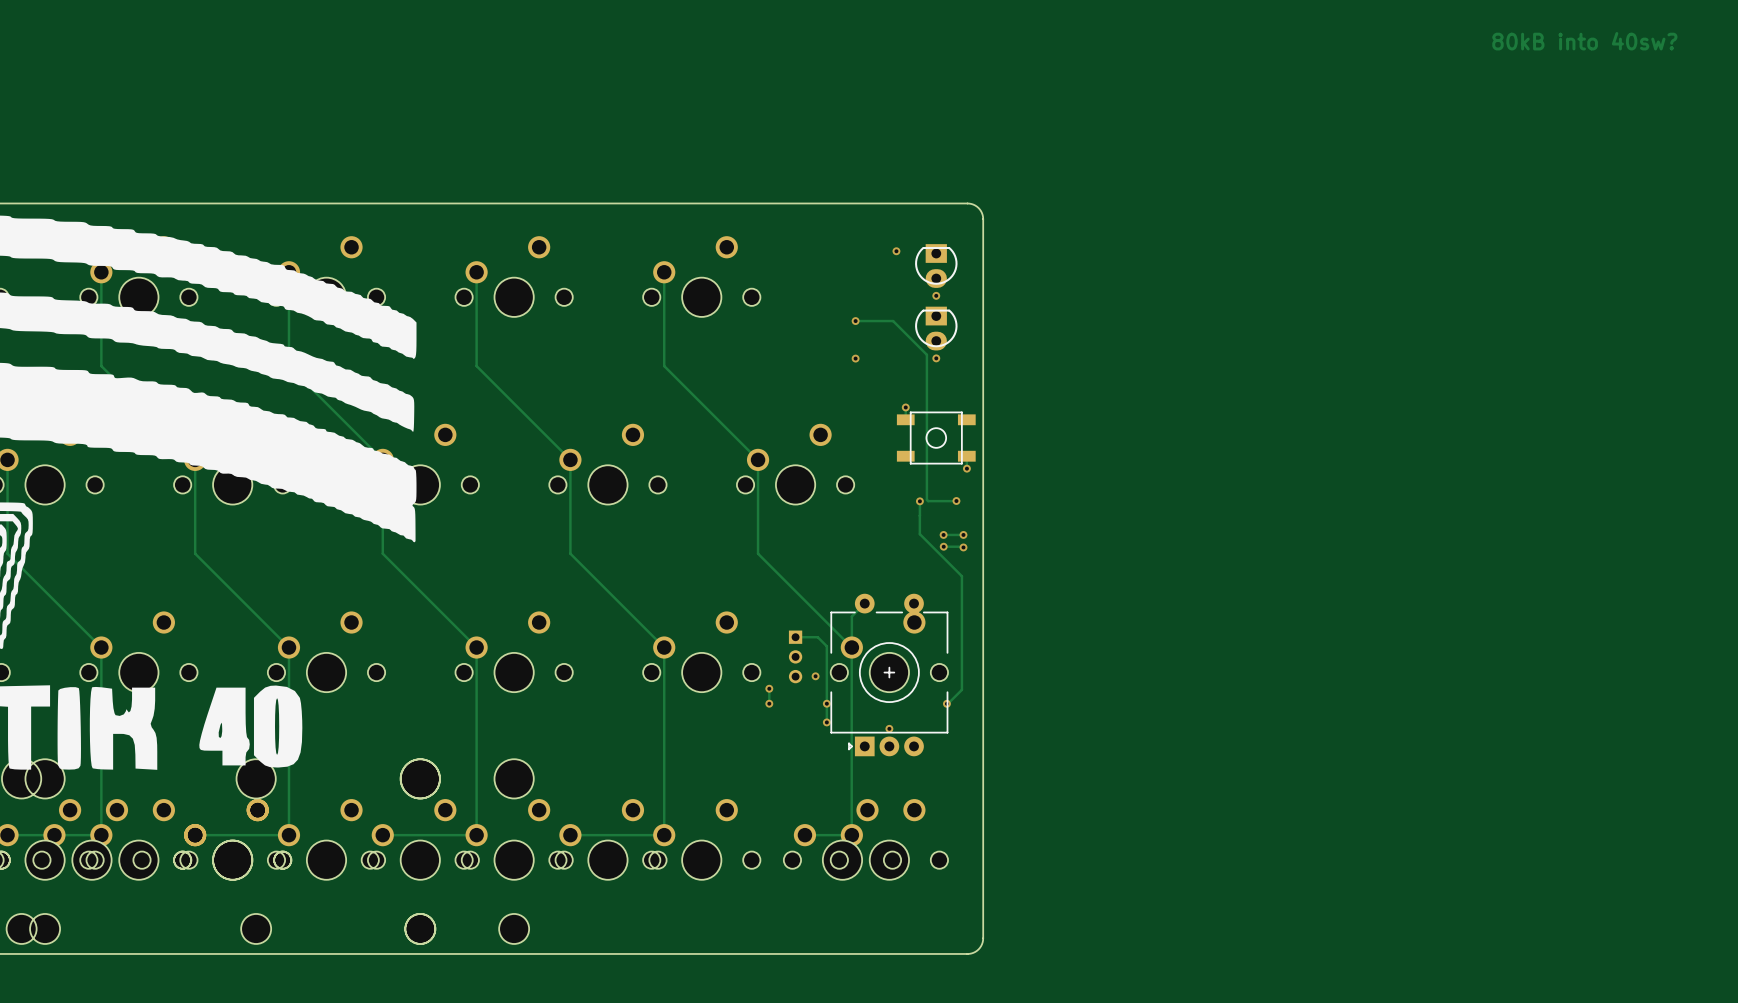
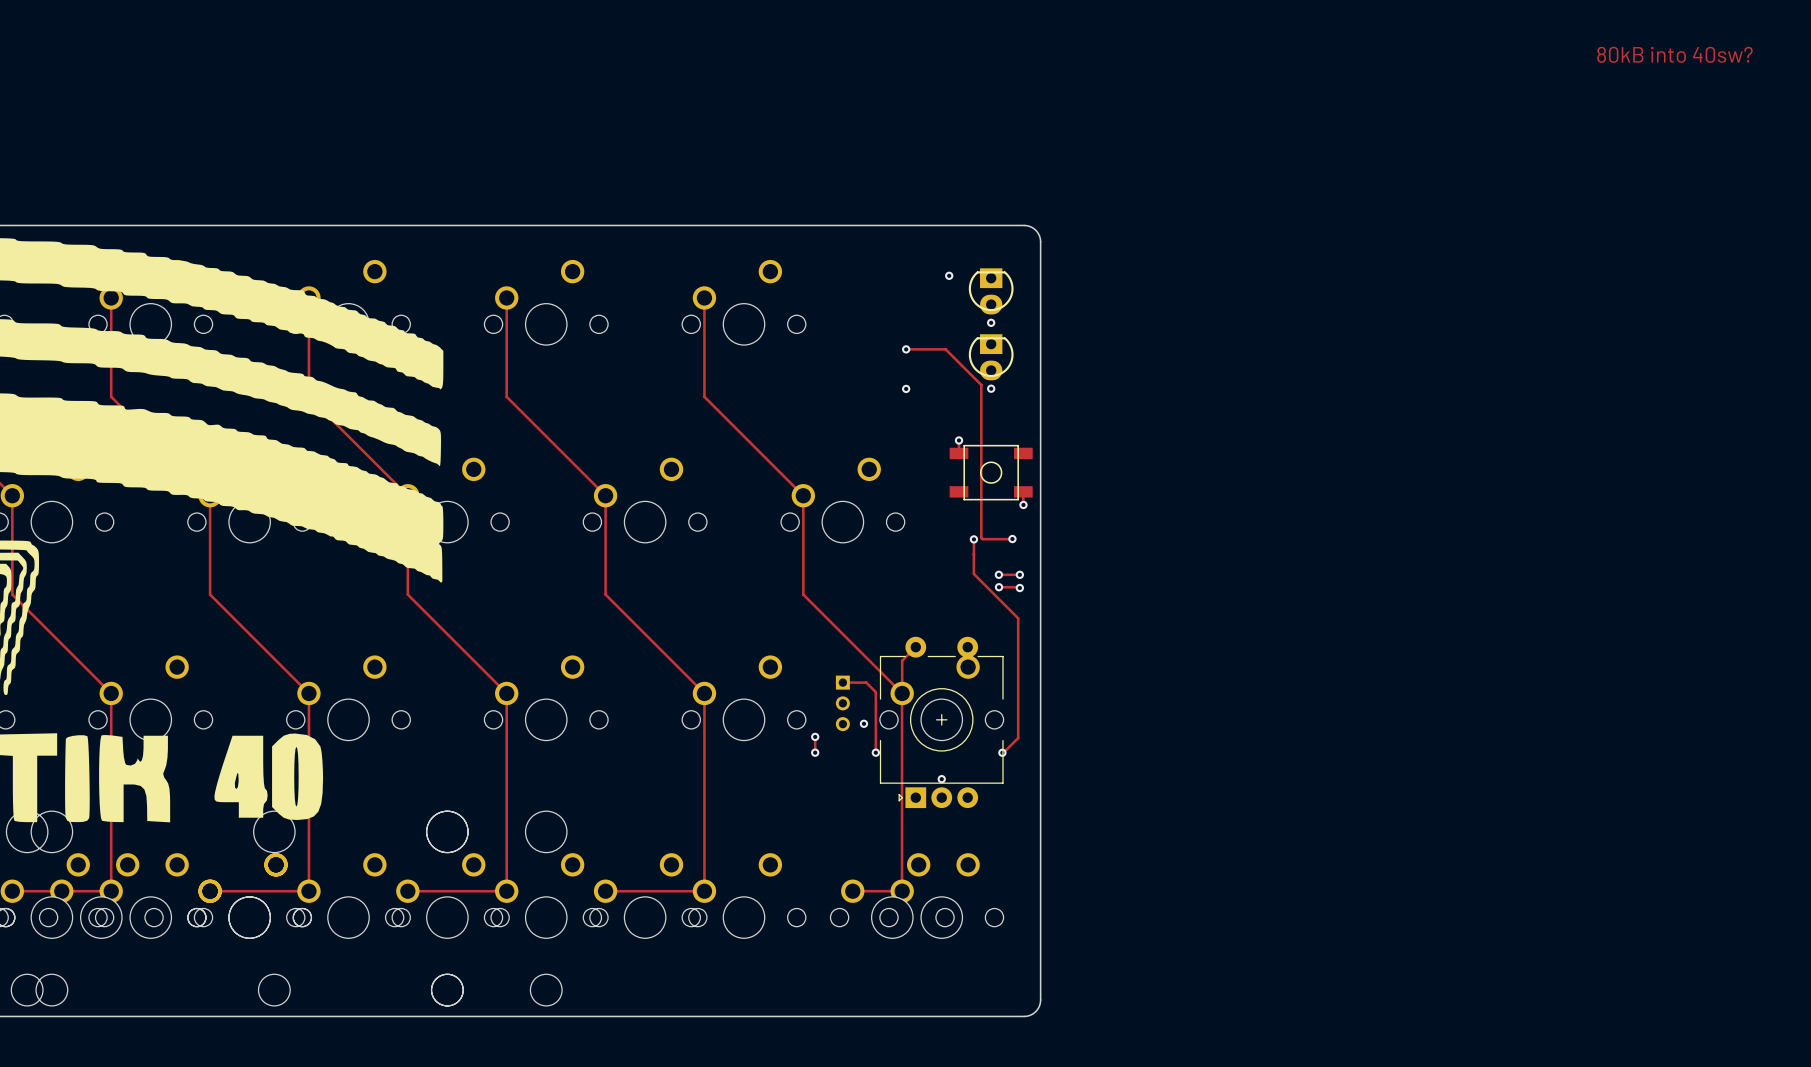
track: (826, 703) (826, 722) -> none
via: (826, 722) -> none

